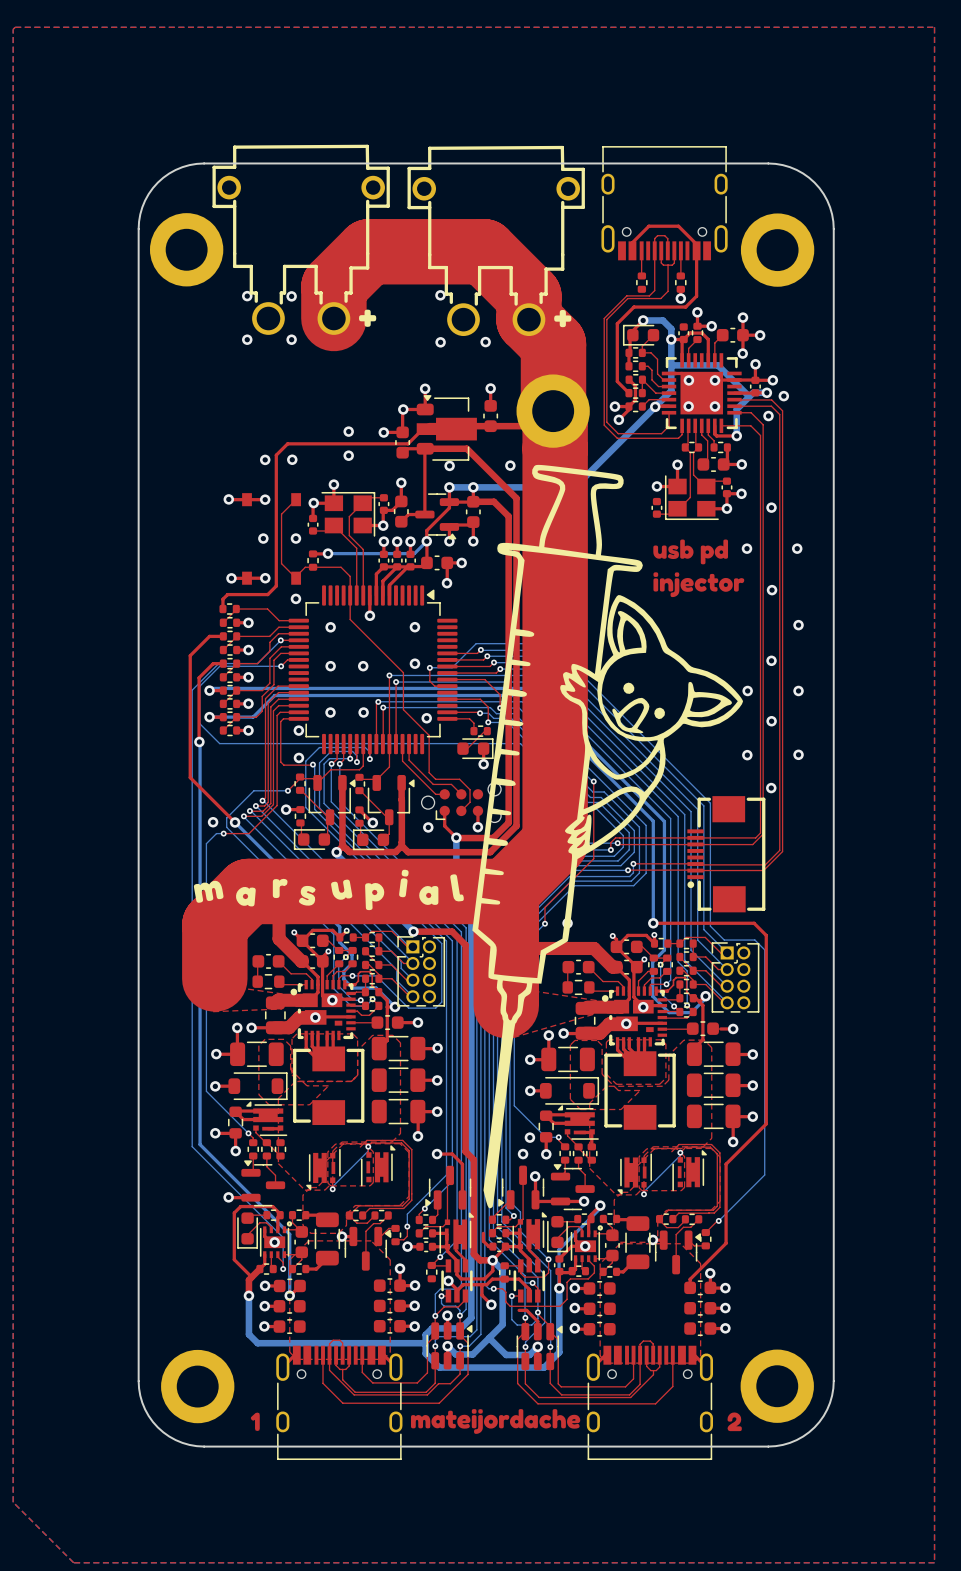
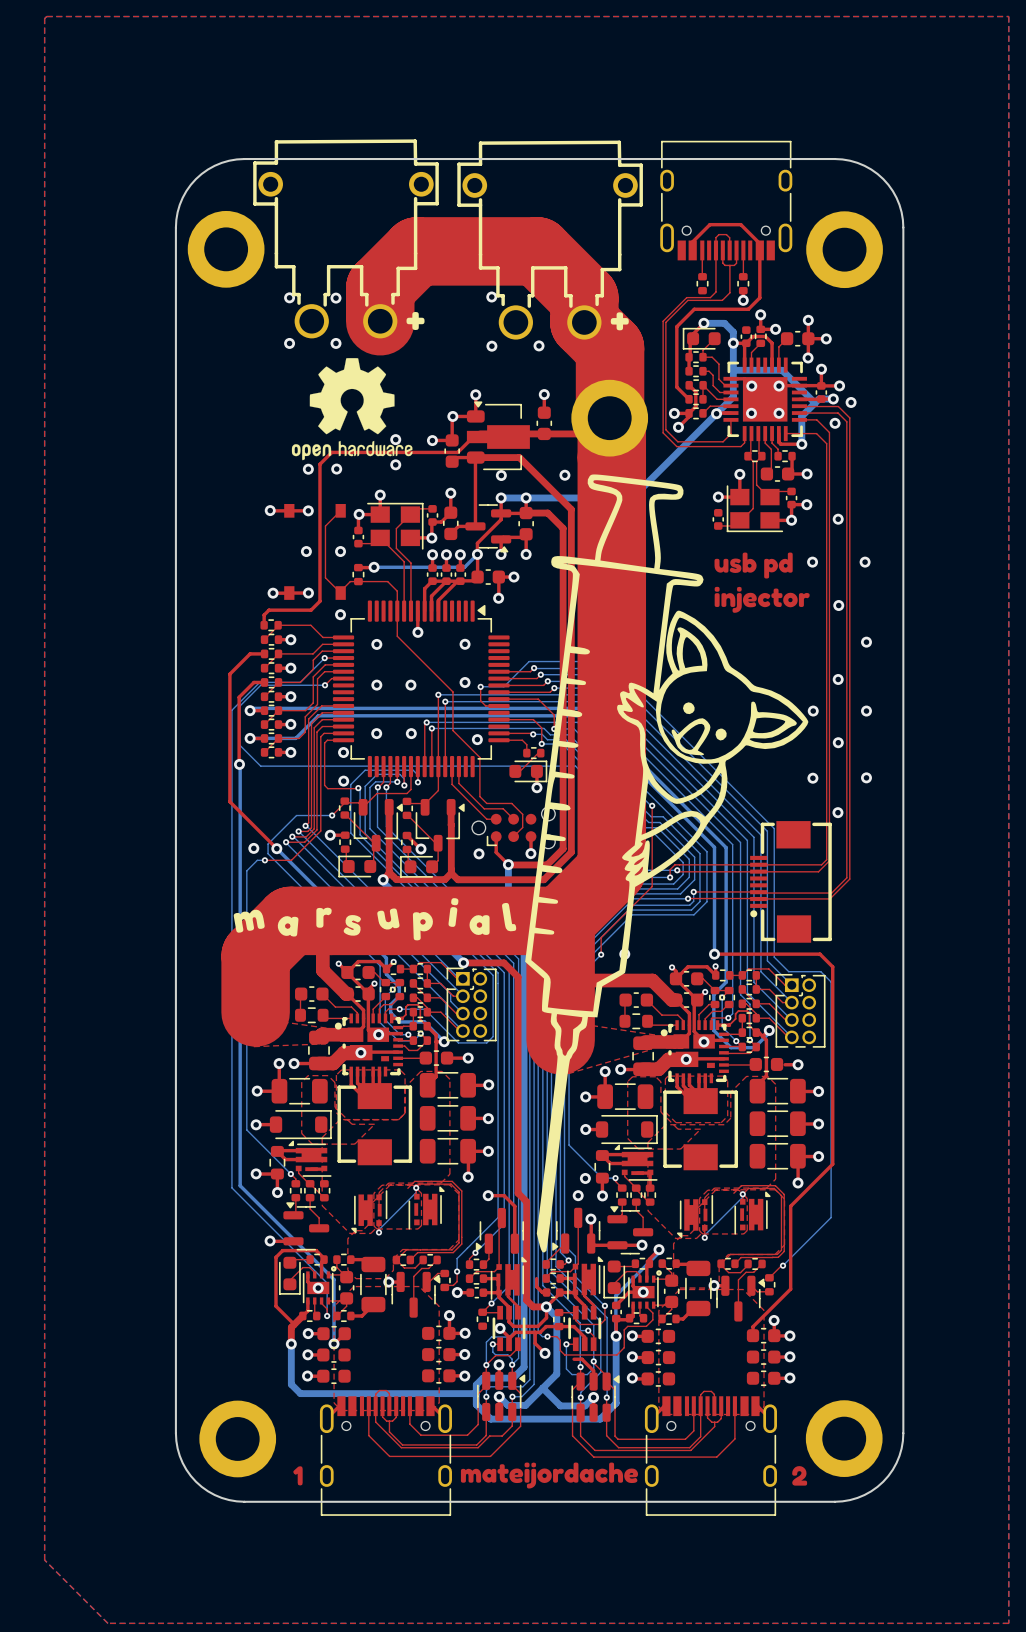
drawing: none -> [291, 358, 413, 461]

